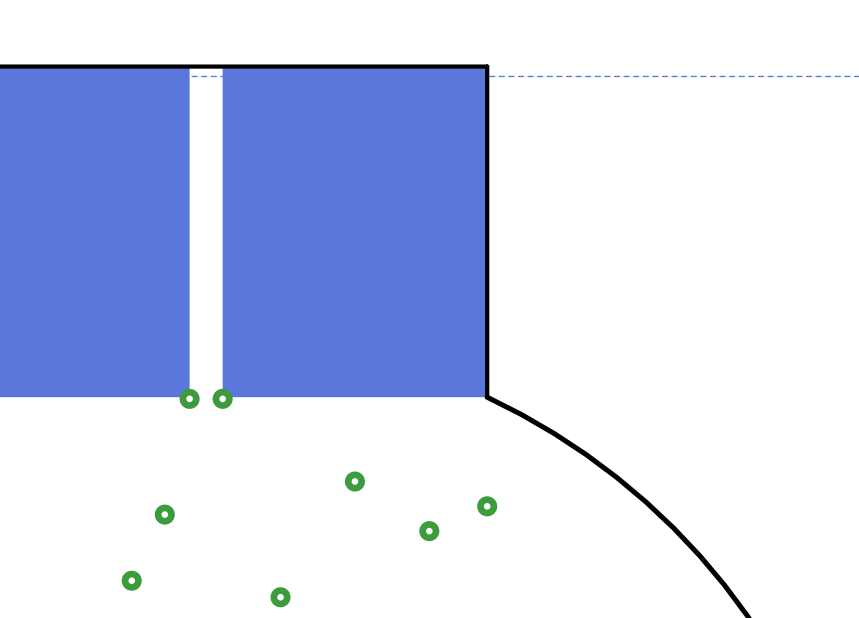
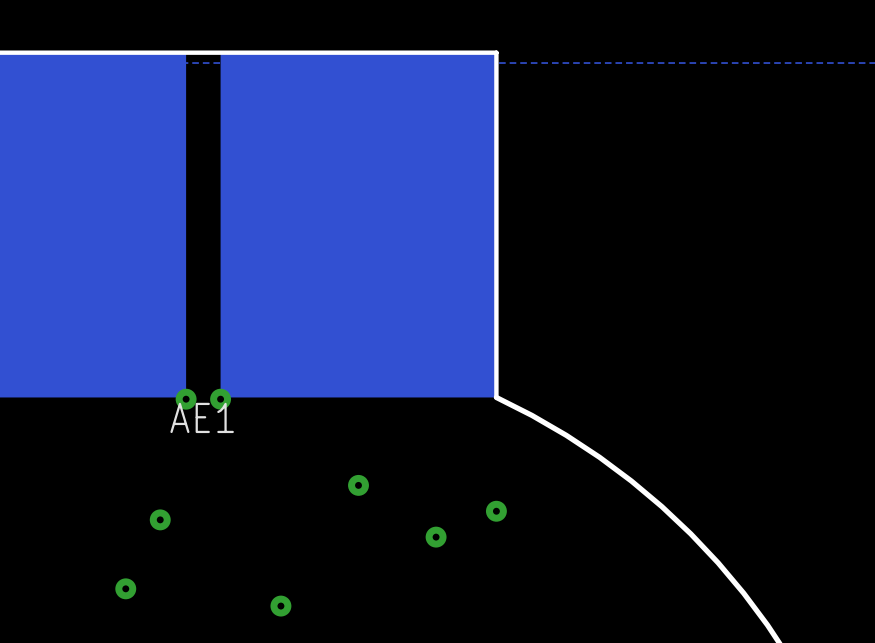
AE1 name: none -> AE1 (202, 417)

